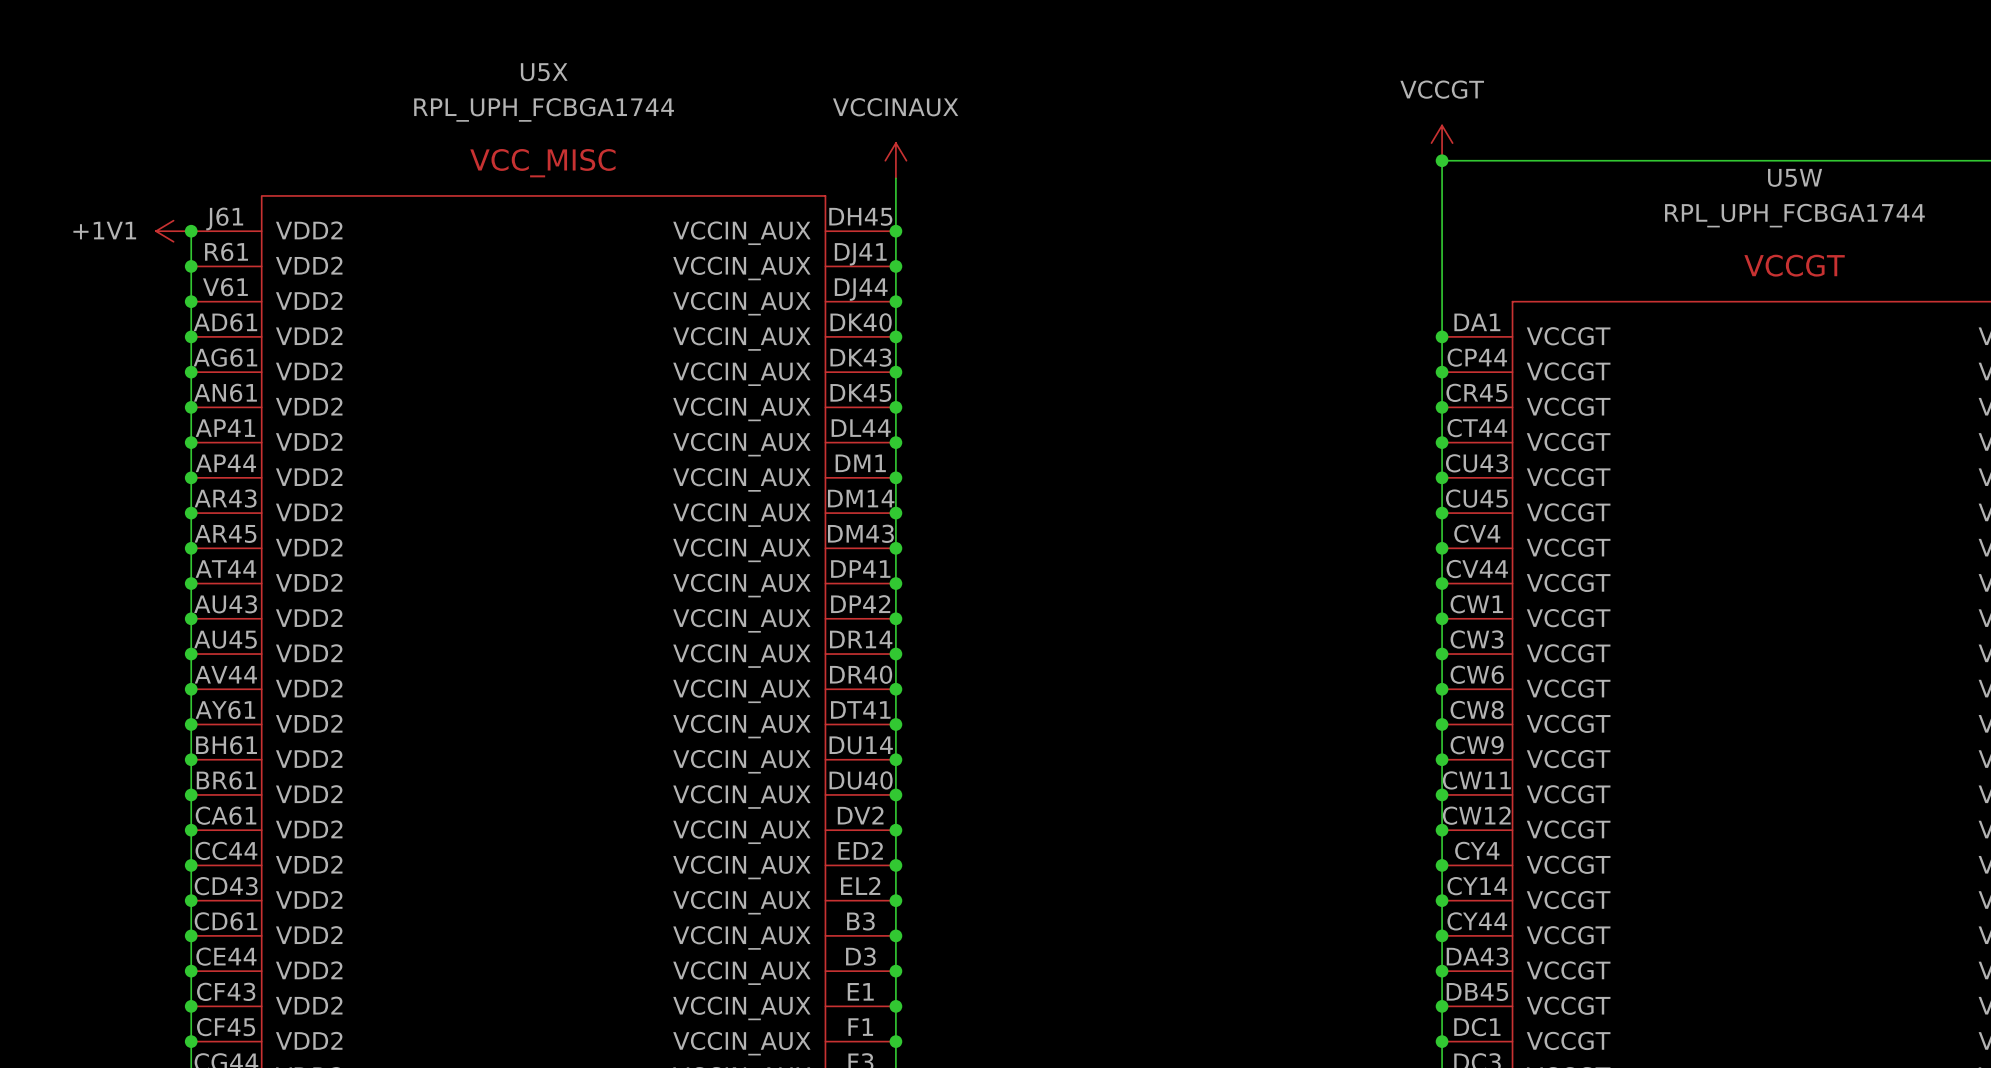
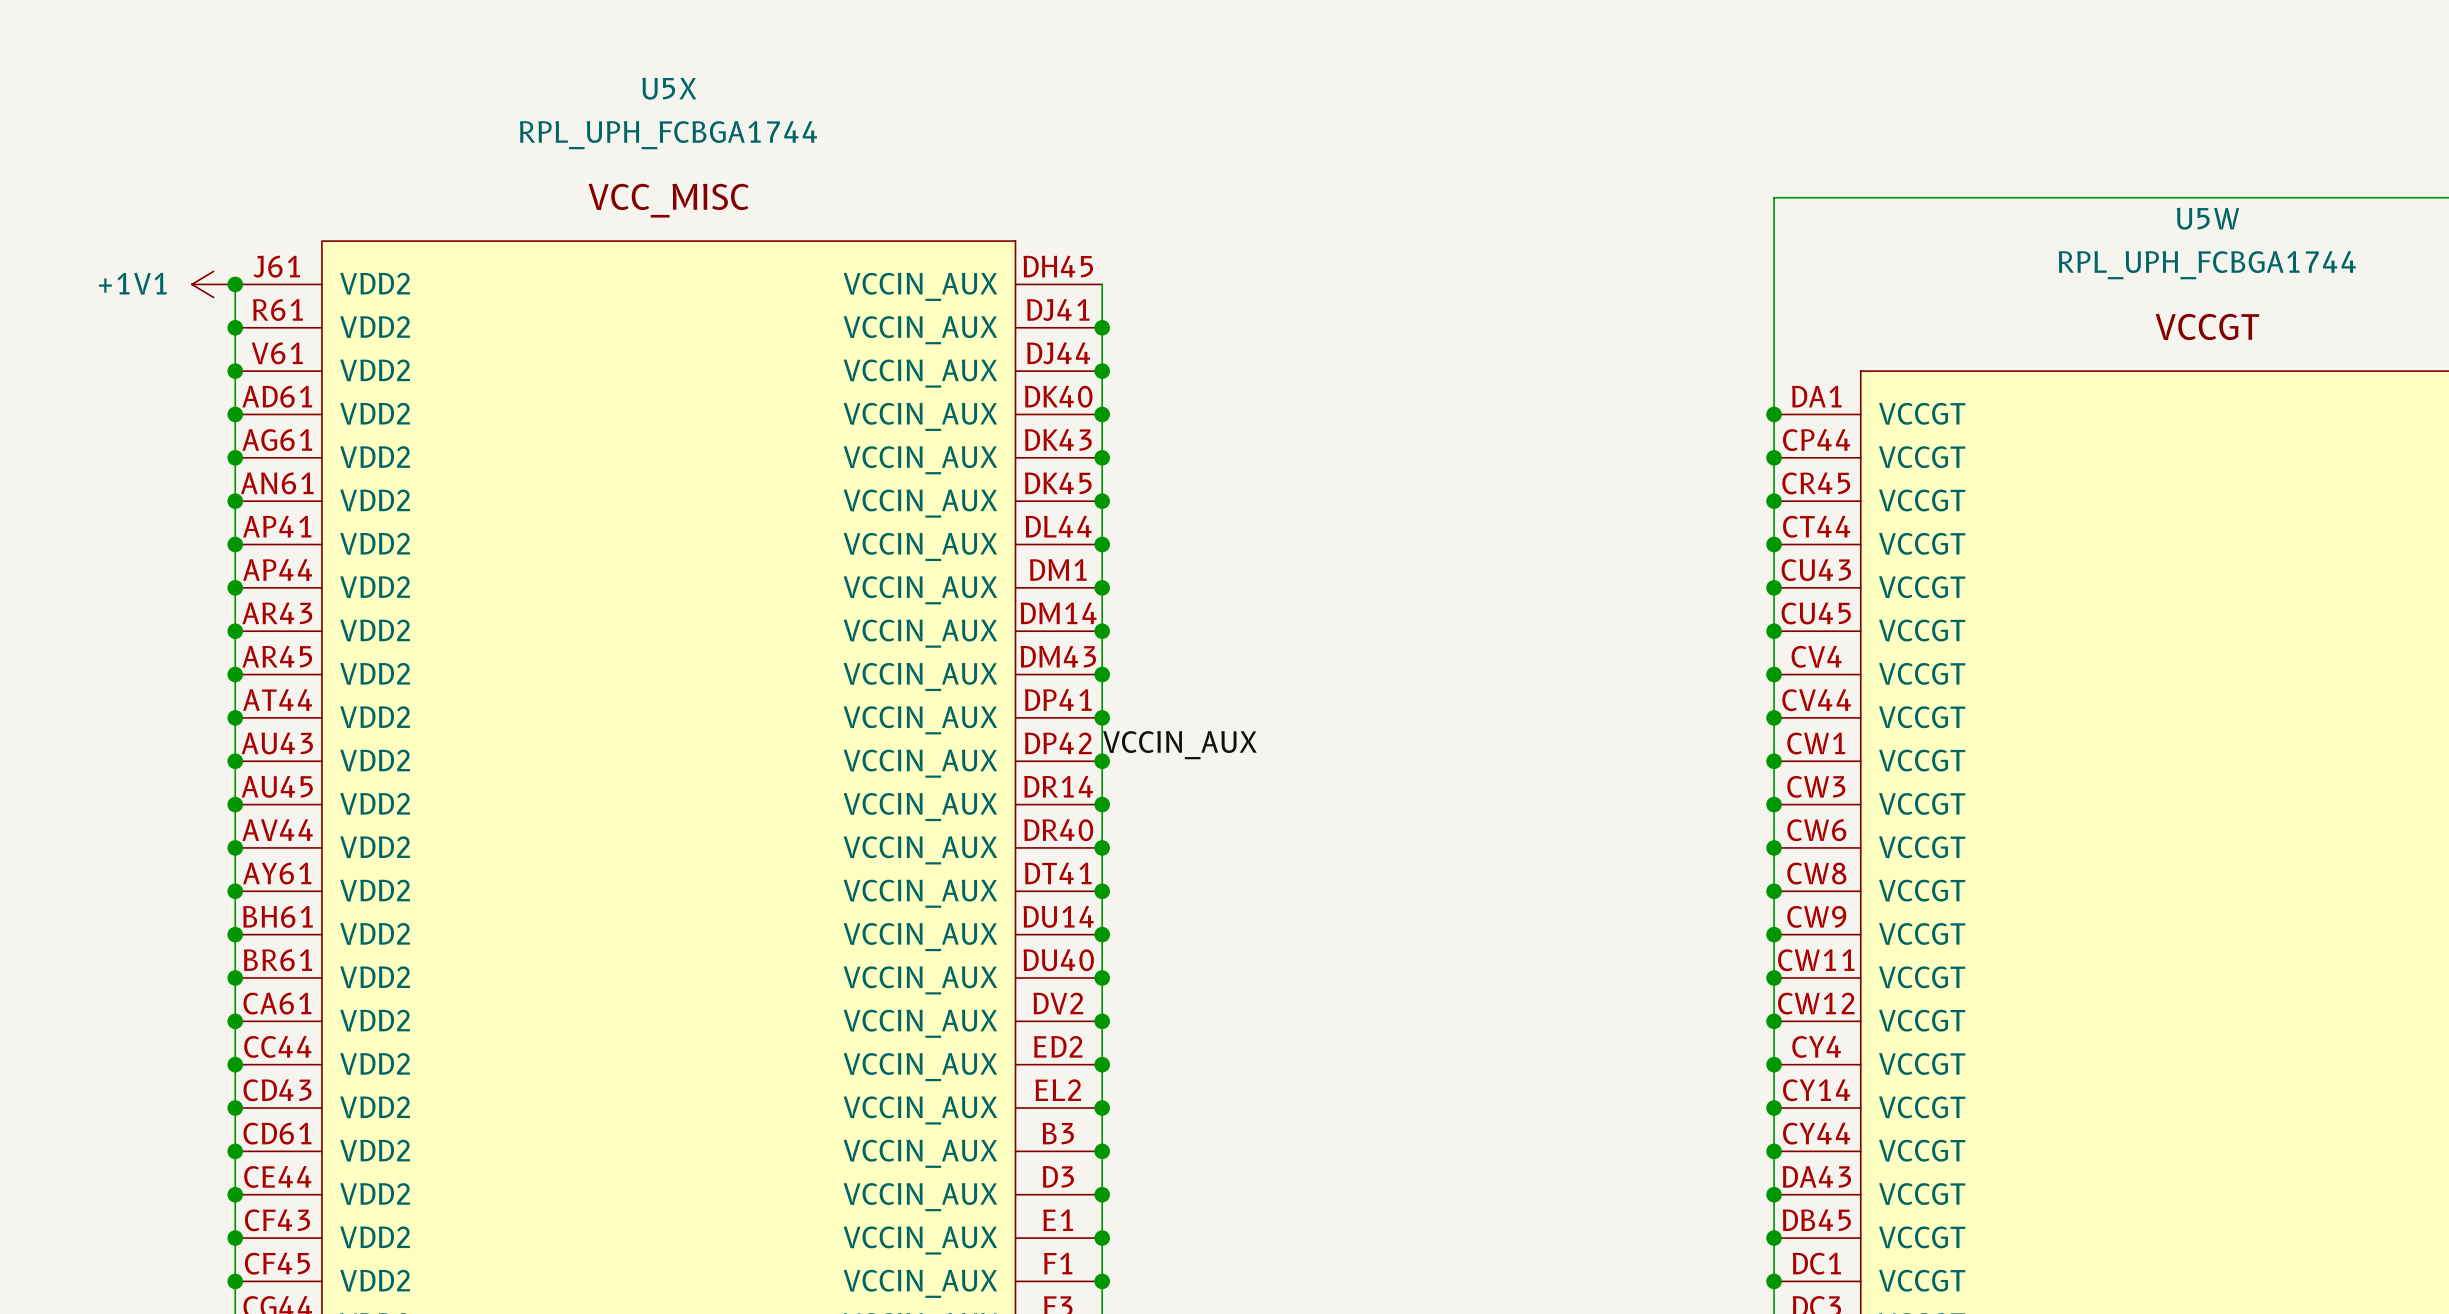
power symbol: VCCGT (1442, 143) -> none
power symbol: VCCINAUX (895, 160) -> none
junction: (1442, 160) -> none
wire: (895, 178) (895, 231) -> none
junction: (895, 231) -> none
label: none -> VCCIN_AUX (1179, 745)

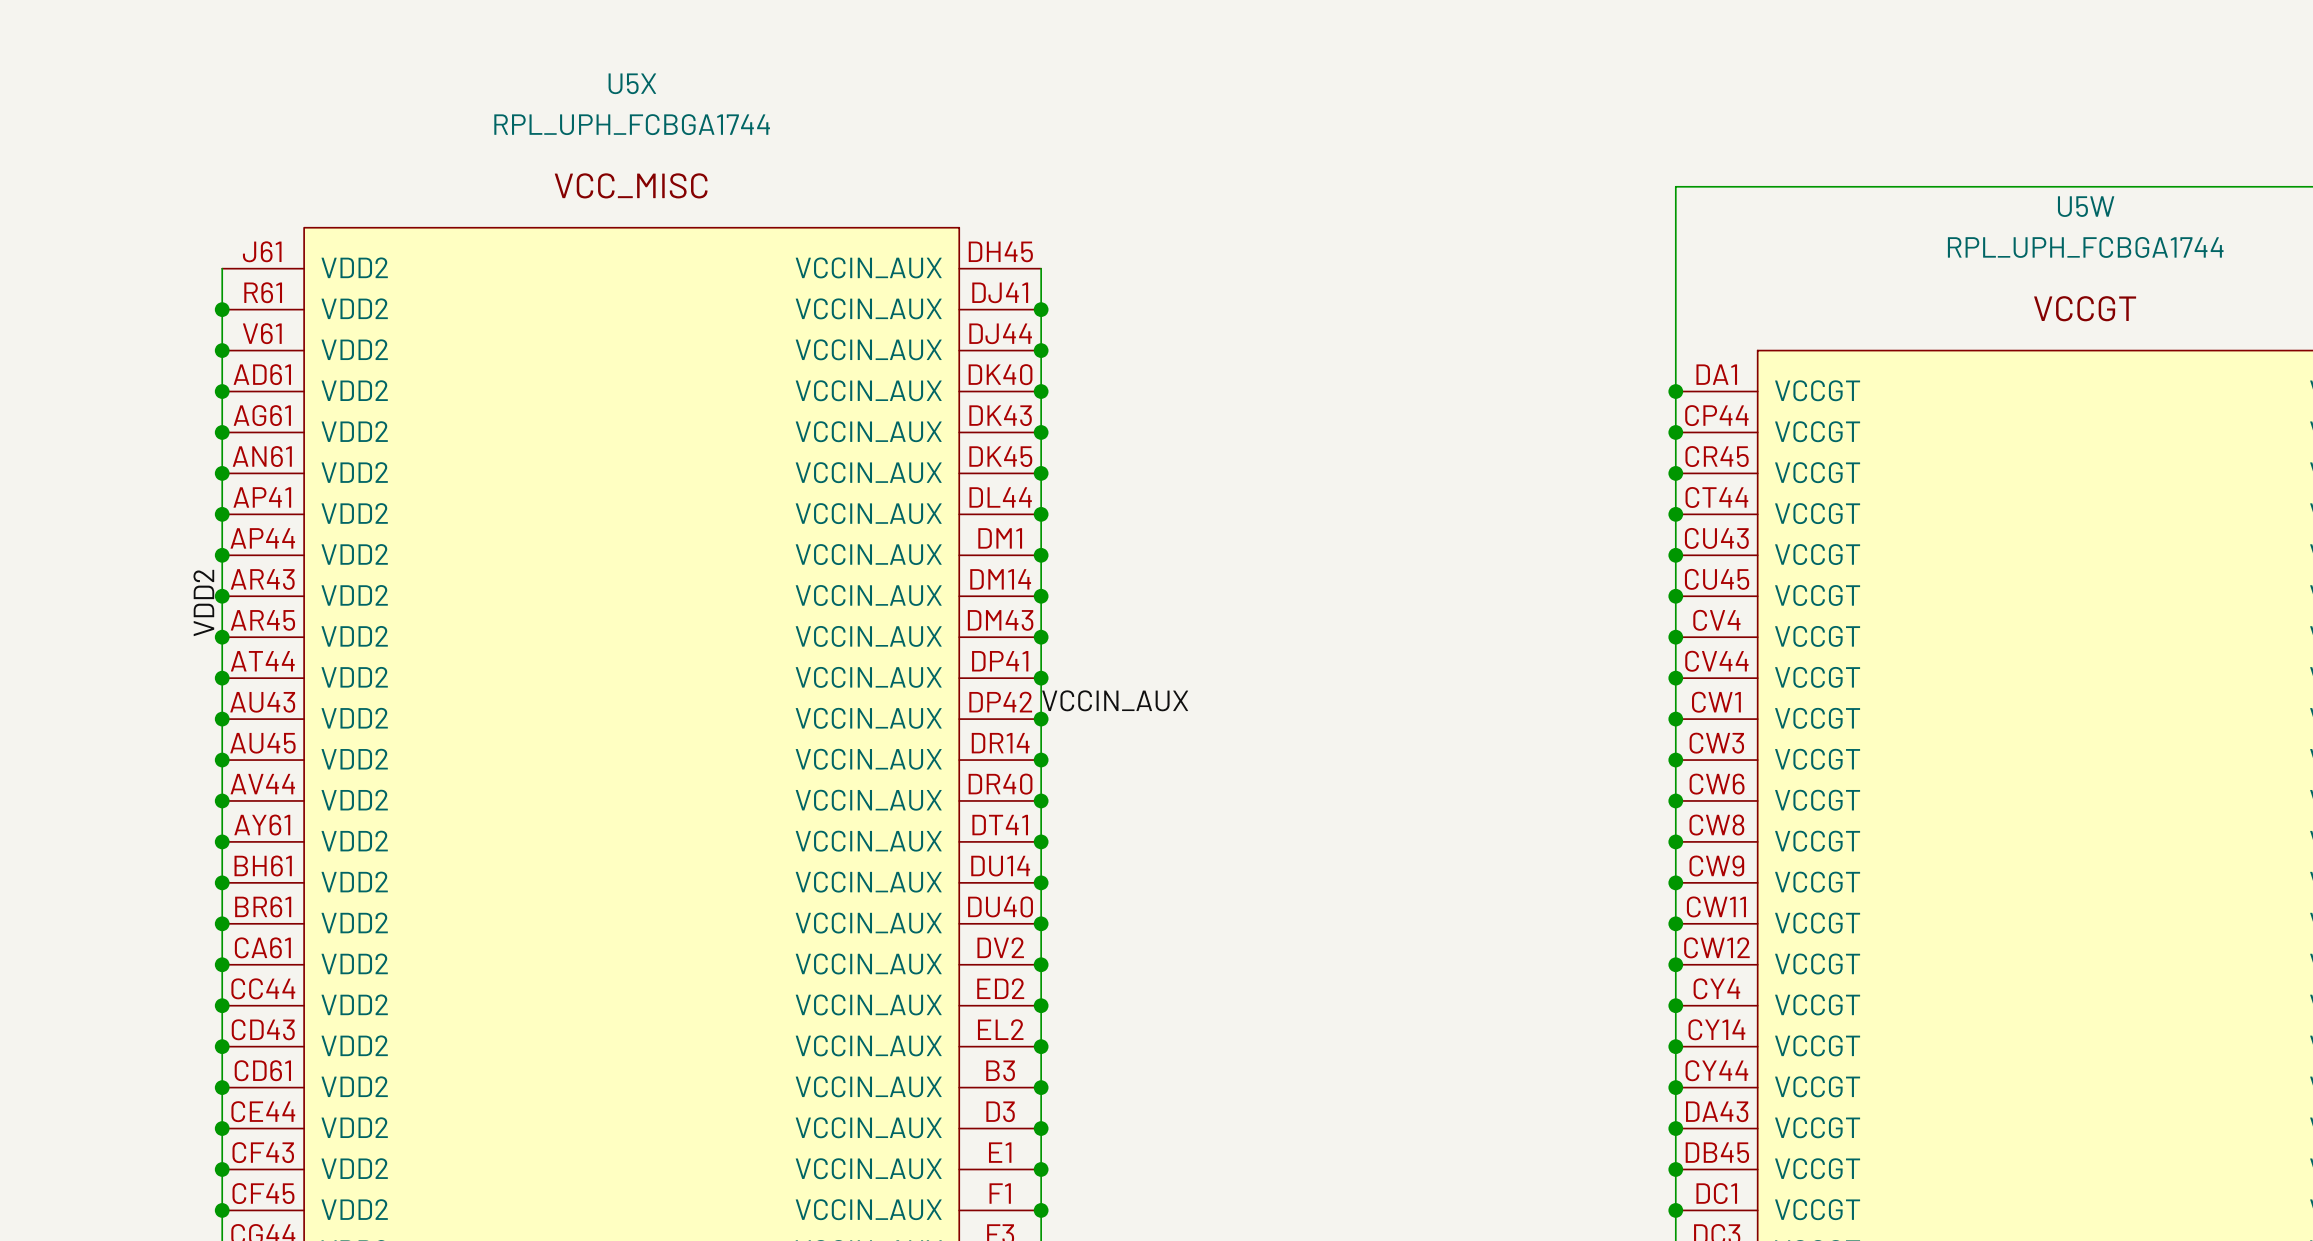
power symbol: +1V1 (213, 284) -> none
junction: (235, 284) -> none
label: none -> VDD2 (203, 603)

